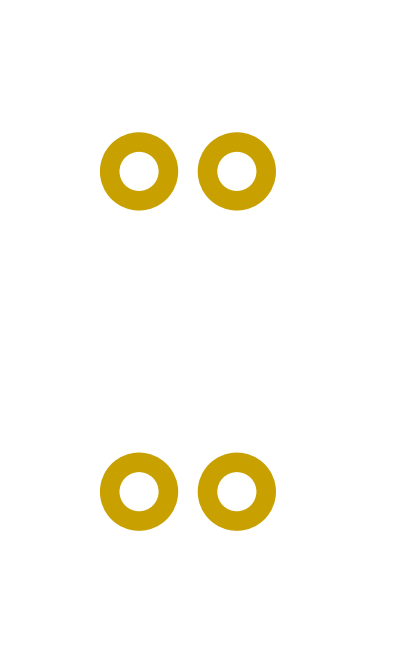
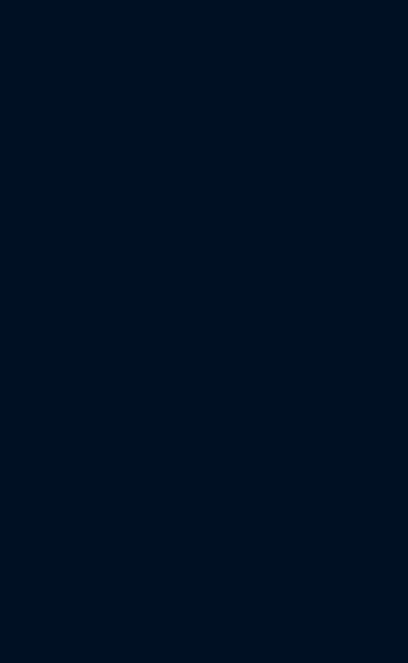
part: (187, 171) -> none
part: (187, 491) -> none

